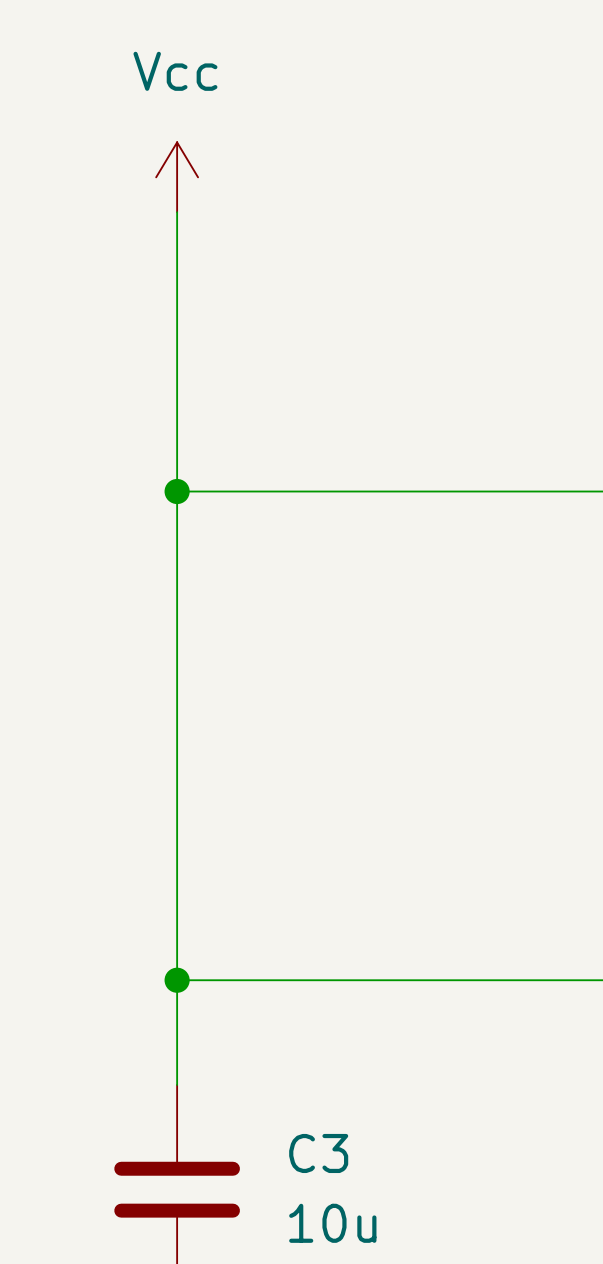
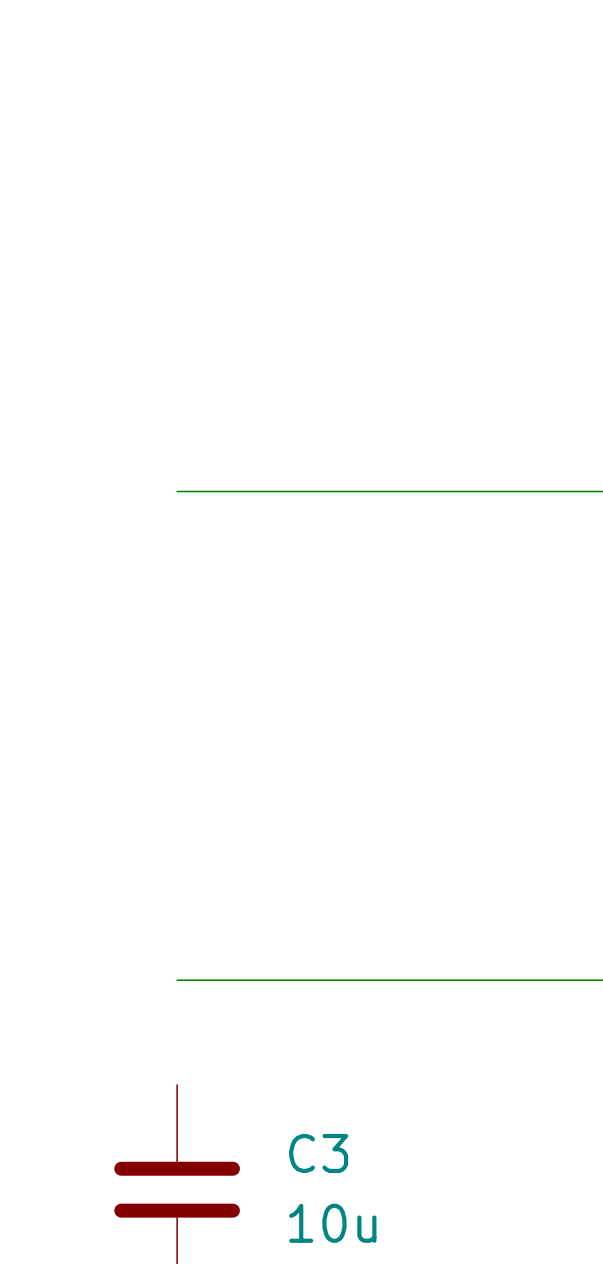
power symbol: Vcc (177, 177) -> none
wire: (177, 212) (177, 1084) -> none
junction: (177, 491) -> none
junction: (177, 980) -> none

